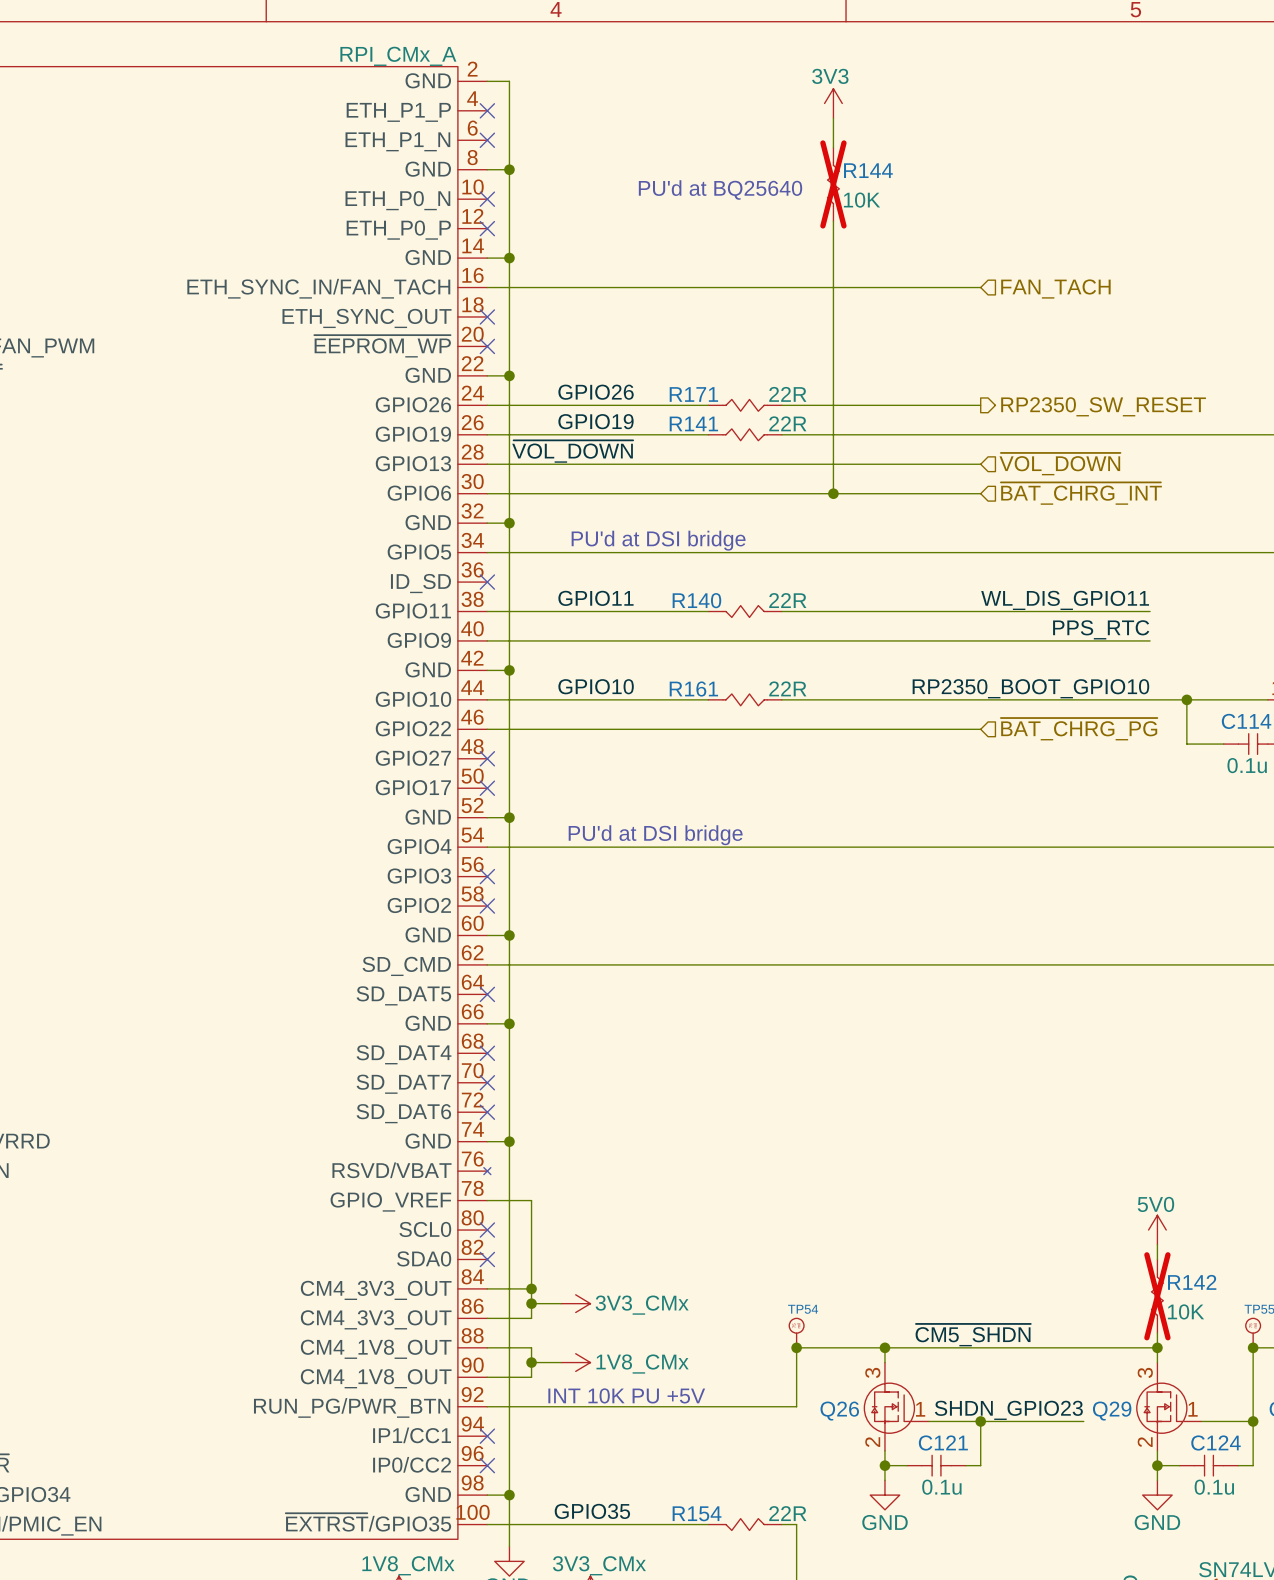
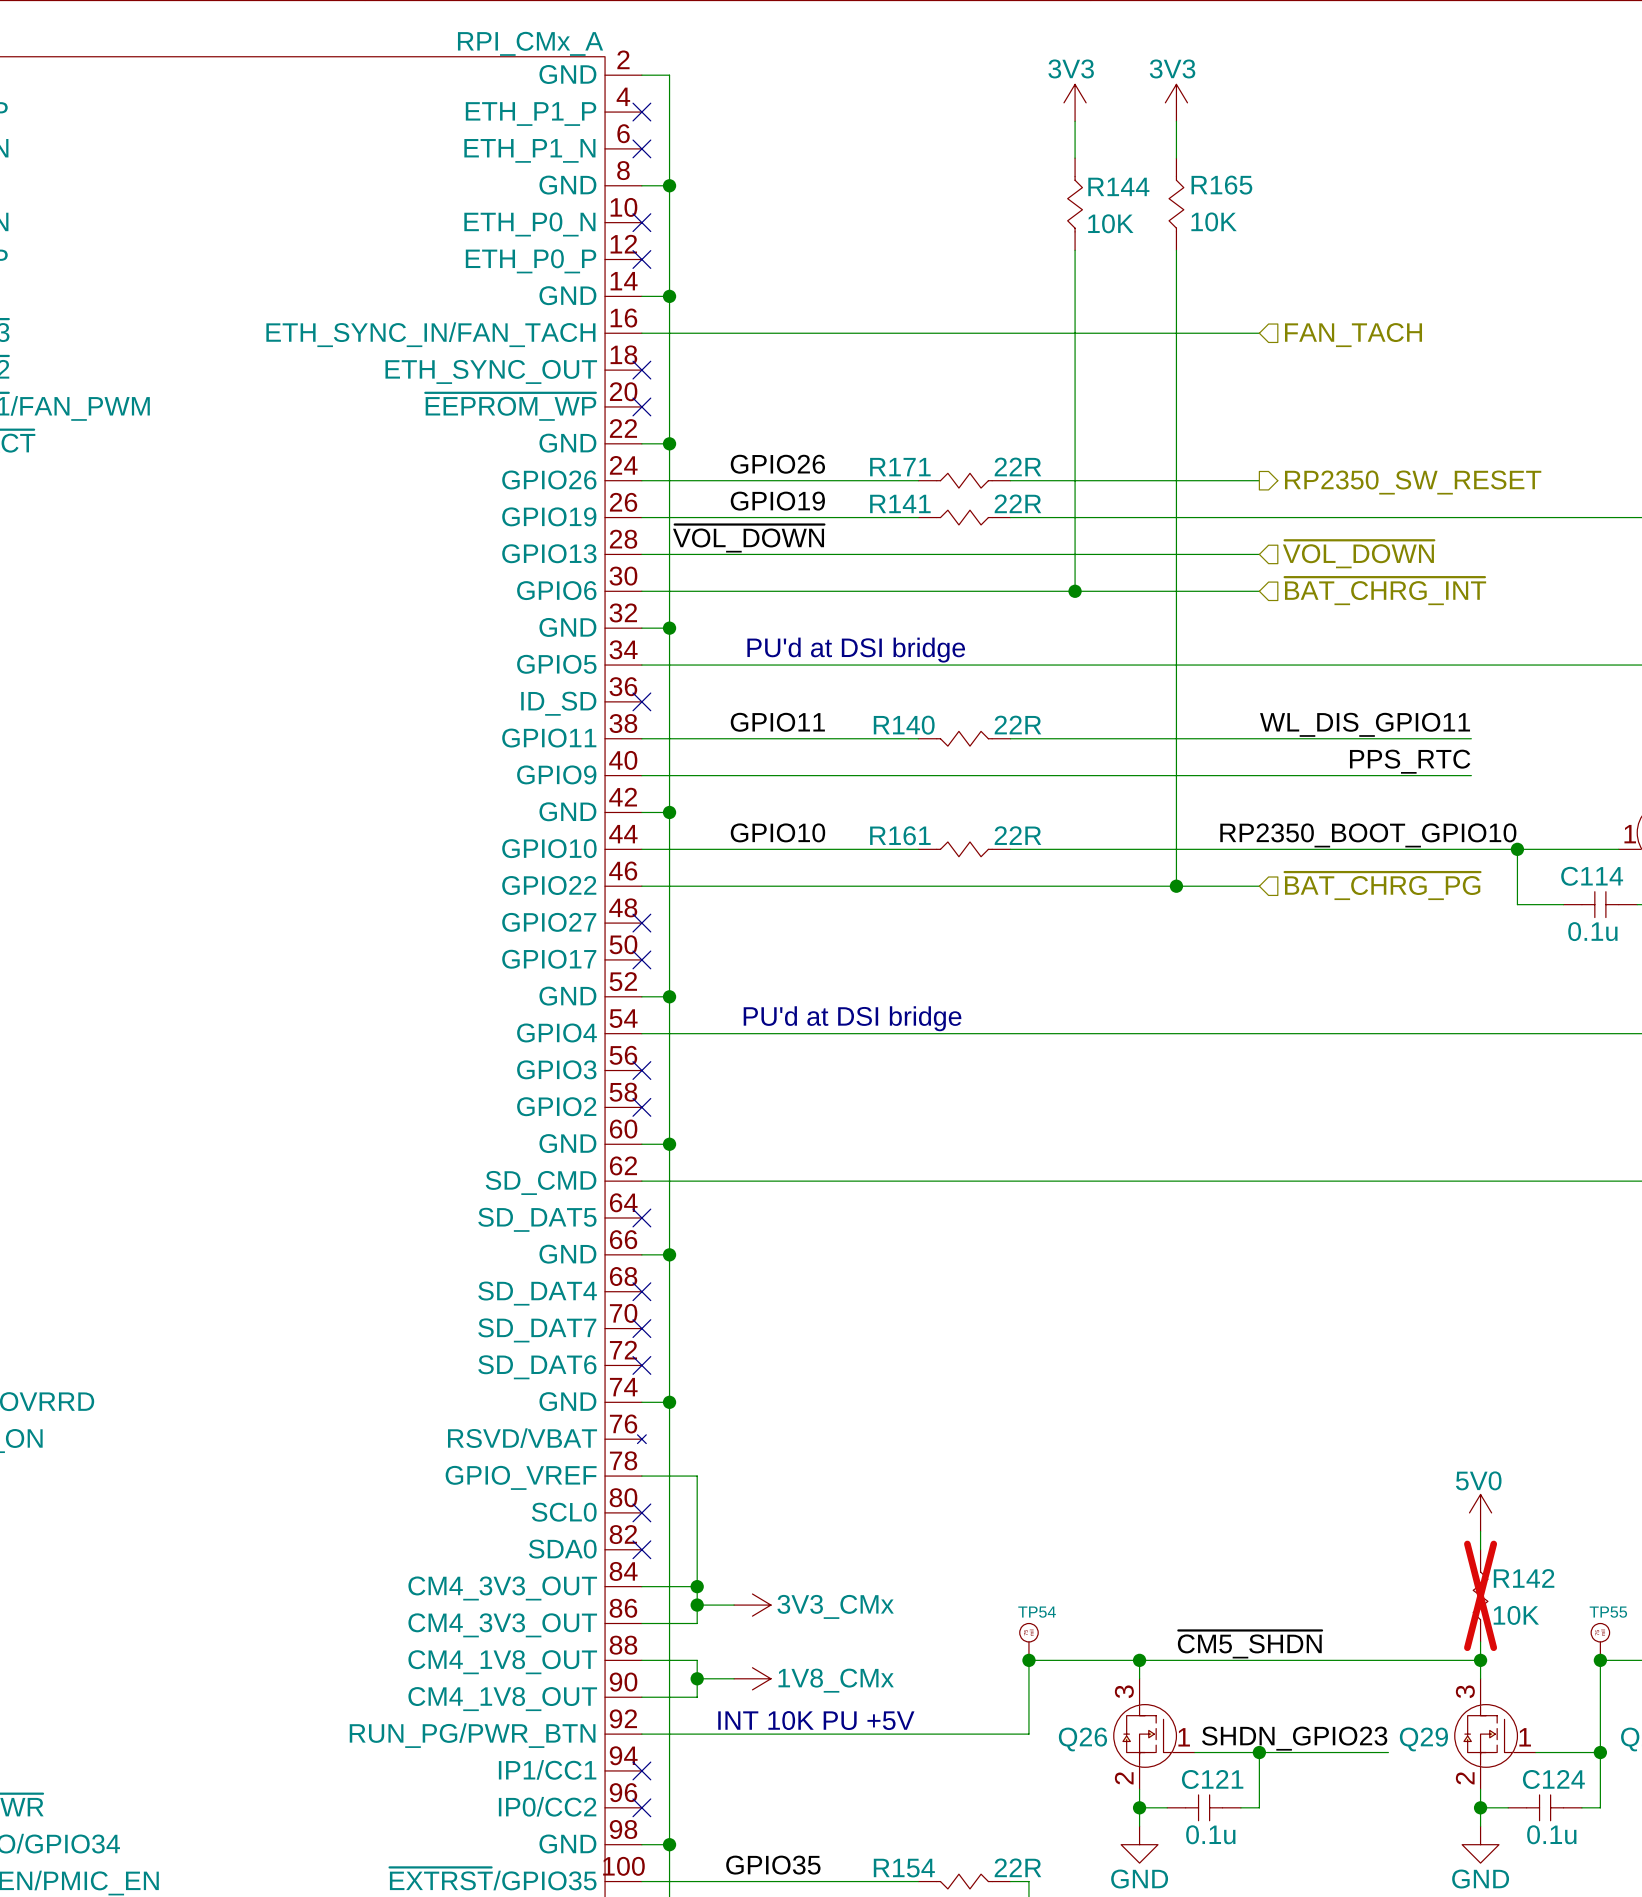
power symbol: none -> 3V3 (1176, 102)
wire: none -> (1176, 121) (1176, 158)
R144 do-not-place cross: (833, 184) -> none
R165: none -> 10K (1176, 204)
text: PU'd at BQ25640 (720, 189) -> none
wire: none -> (1176, 250) (1176, 886)
label position: RP2350_BOOT_GPIO10 (1030, 688) -> RP2350_BOOT_GPIO10 (1368, 835)
junction: none -> (1176, 886)

